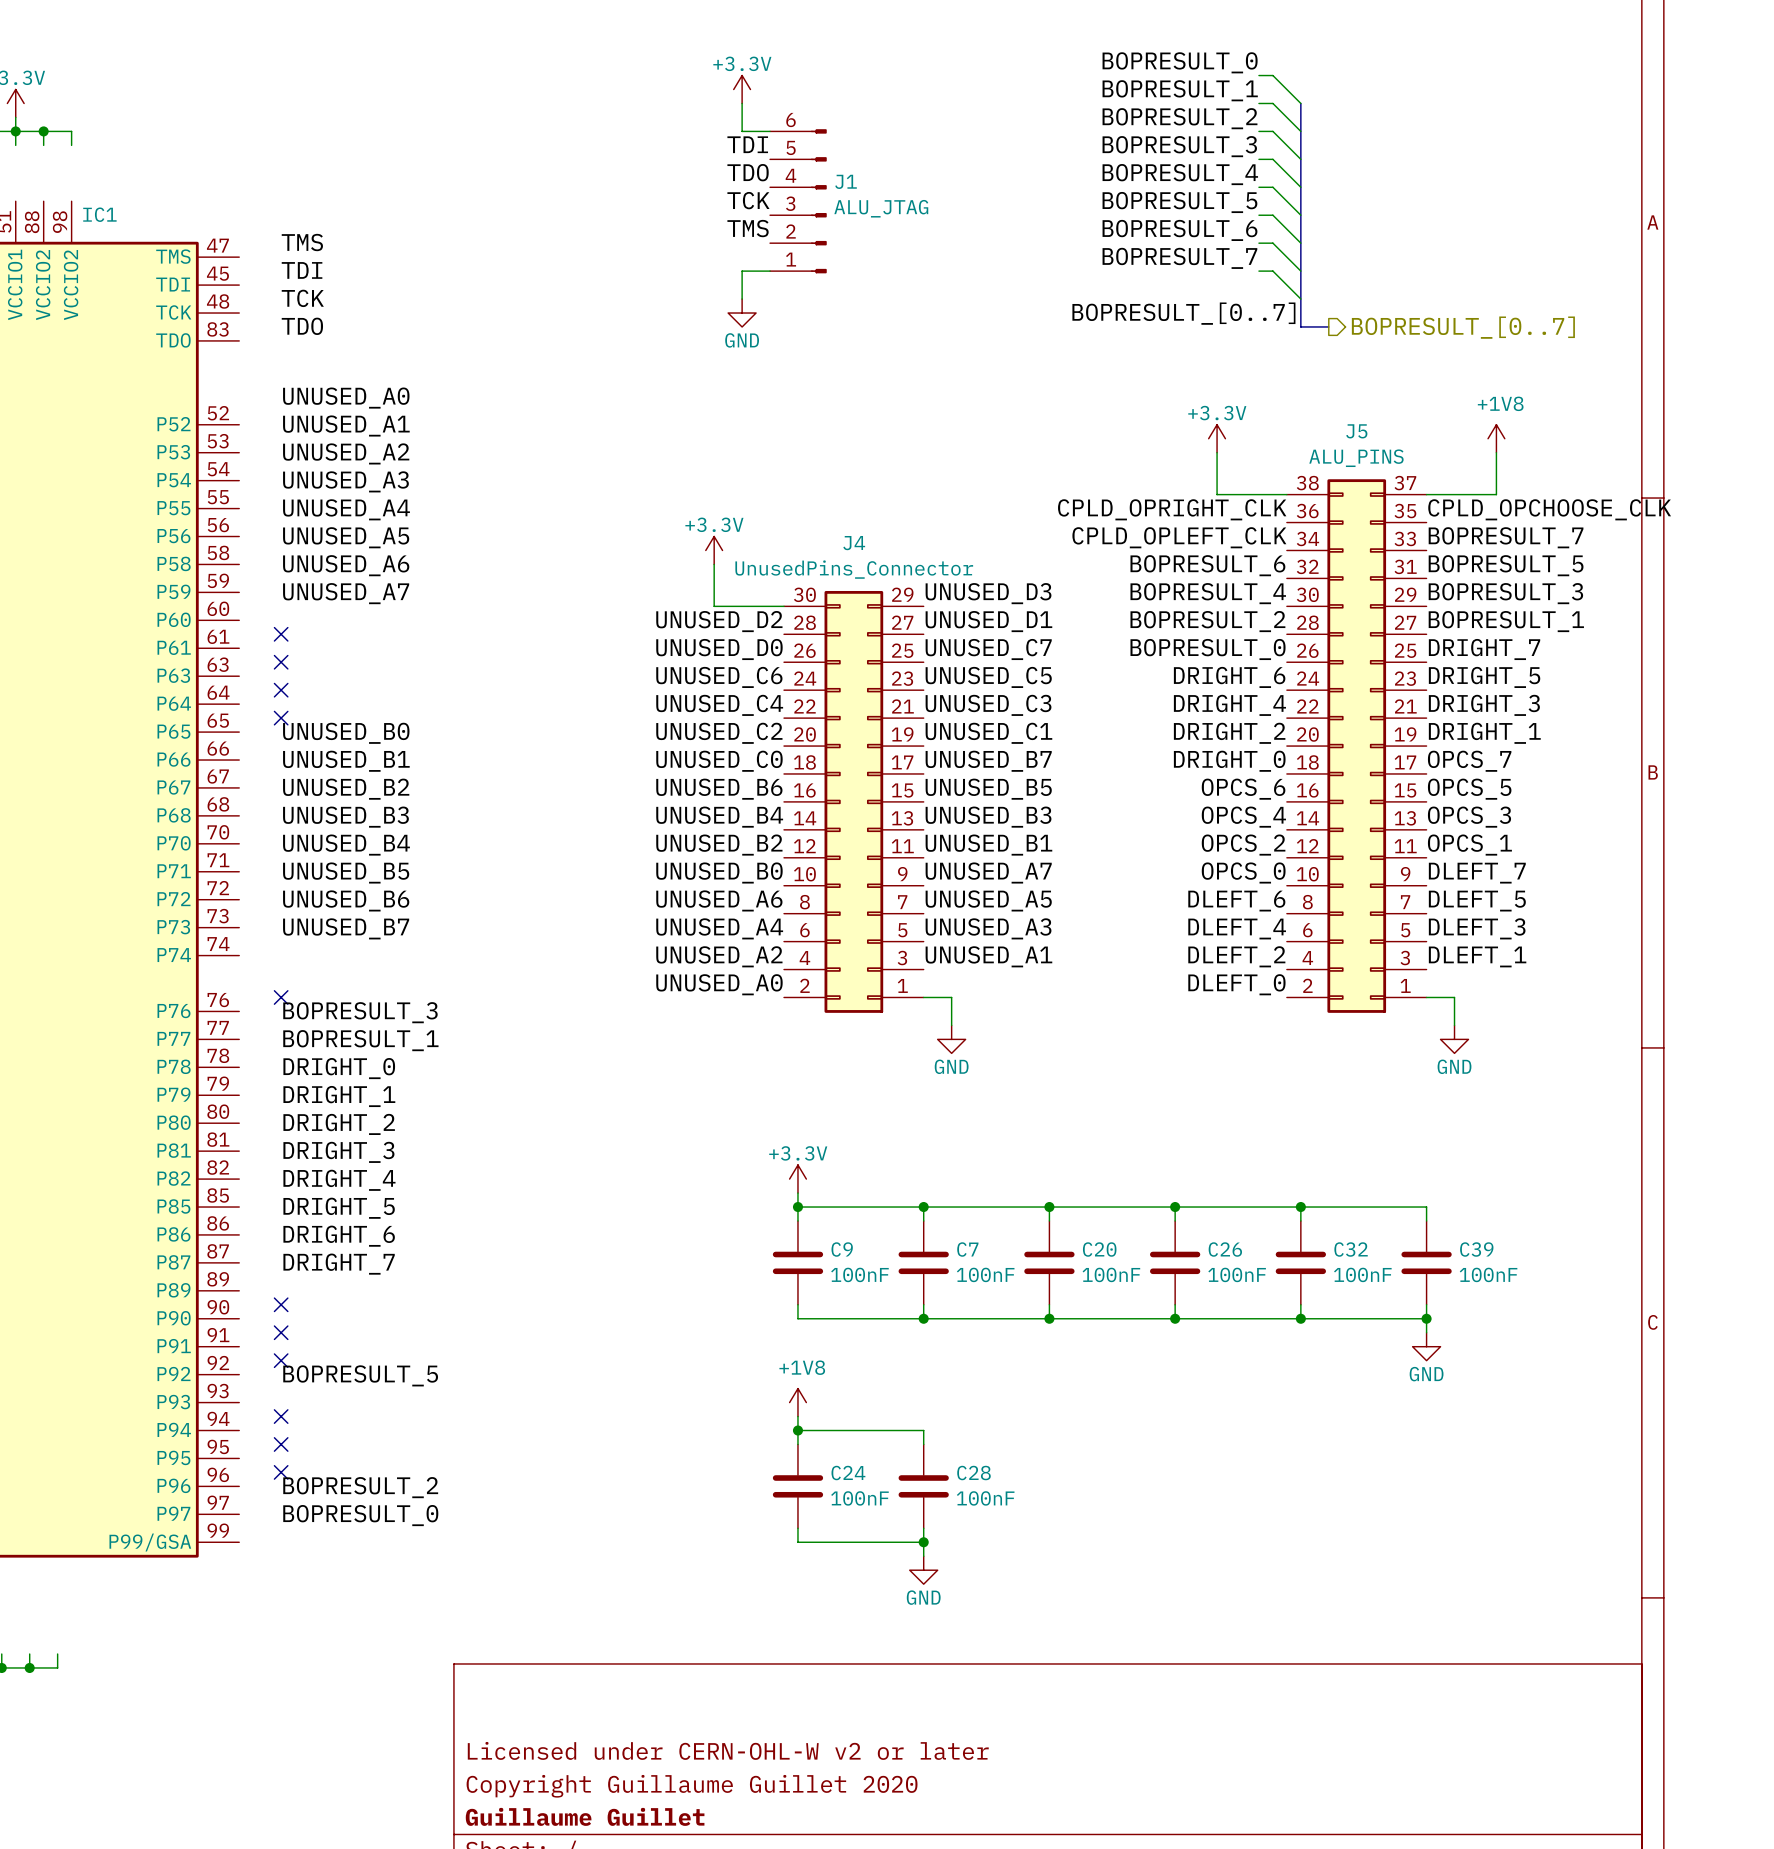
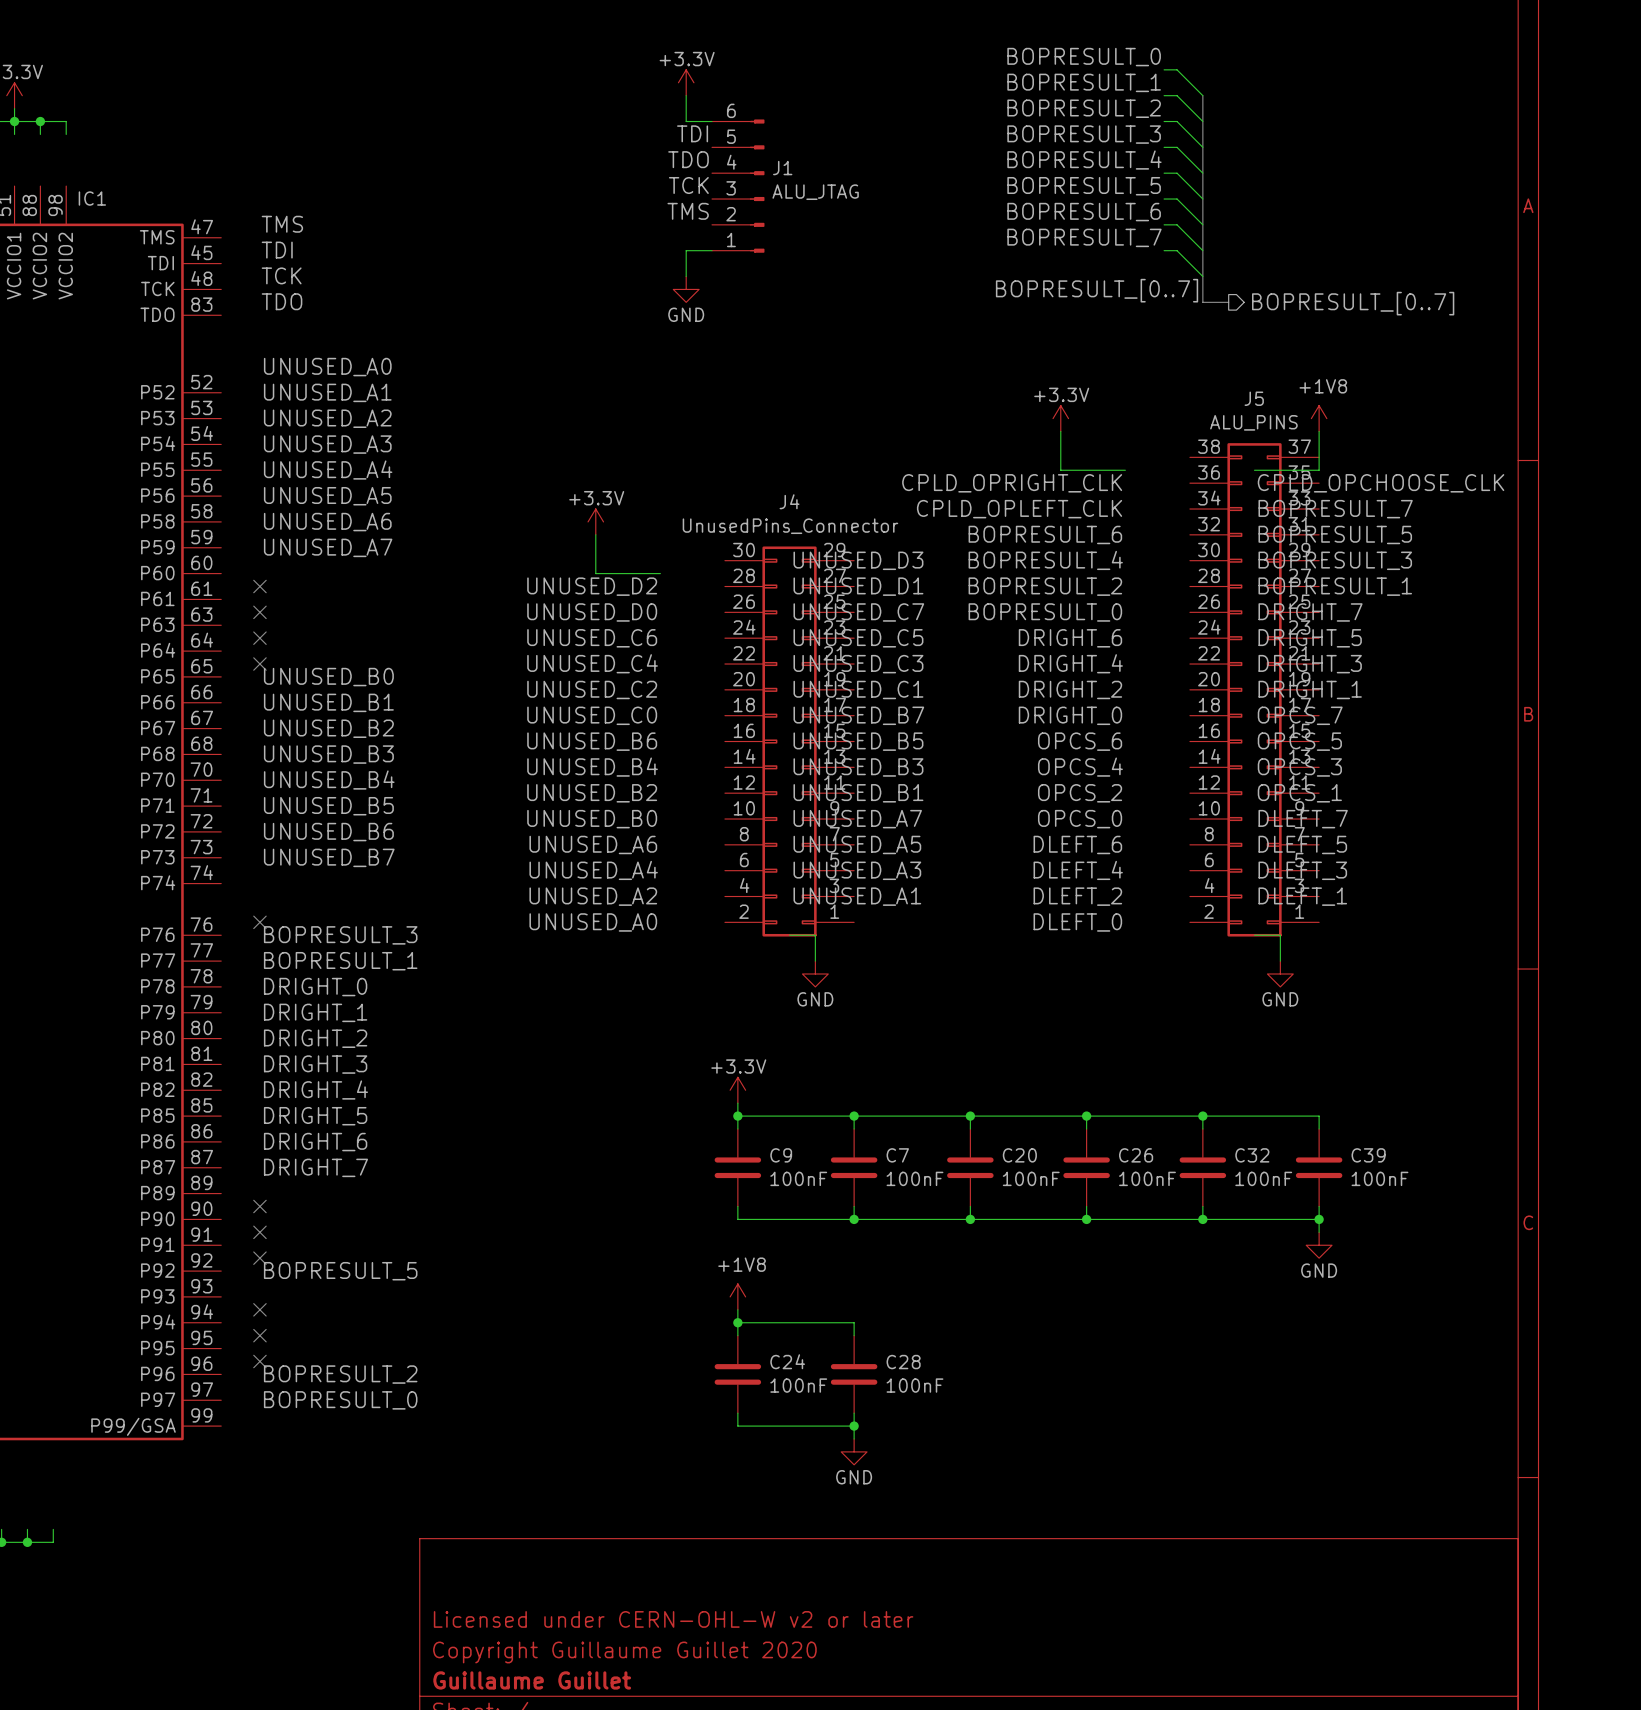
power symbol position: +3.3V (1217, 438) -> +3.3V (1060, 418)
power symbol position: +1V8 (1496, 438) -> +1V8 (1319, 418)
wire: (1217, 452) (1217, 494) (1286, 494) -> (1060, 431) (1060, 470) (1125, 470)
wire: (1496, 452) (1496, 494) (1426, 494) -> (1319, 431) (1319, 470) (1254, 470)
label position: CPLD_OPRIGHT_CLK (1172, 509) -> CPLD_OPRIGHT_CLK (1012, 483)
label position: CPLD_OPCHOOSE_CLK (1549, 509) -> CPLD_OPCHOOSE_CLK (1381, 483)
label position: CPLD_OPLEFT_CLK (1179, 537) -> CPLD_OPLEFT_CLK (1019, 509)
label position: BOPRESULT_7 (1506, 537) -> BOPRESULT_7 (1335, 509)
power symbol position: +3.3V (714, 550) -> +3.3V (595, 521)
wire: (714, 564) (714, 606) (784, 606) -> (595, 534) (595, 573) (660, 573)
label position: BOPRESULT_6 (1207, 565) -> BOPRESULT_6 (1045, 534)
label position: BOPRESULT_5 (1506, 565) -> BOPRESULT_5 (1335, 534)
label position: UNUSED_D3 (988, 593) -> UNUSED_D3 (858, 560)
label position: BOPRESULT_4 (1208, 593) -> BOPRESULT_4 (1045, 560)
label position: BOPRESULT_3 (1505, 593) -> BOPRESULT_3 (1335, 560)
label position: UNUSED_D2 (719, 621) -> UNUSED_D2 (592, 586)
label position: UNUSED_D1 (988, 621) -> UNUSED_D1 (858, 586)
label position: BOPRESULT_2 (1207, 621) -> BOPRESULT_2 (1045, 586)
label position: BOPRESULT_1 (1506, 621) -> BOPRESULT_1 (1335, 586)
label position: UNUSED_D0 (719, 649) -> UNUSED_D0 (592, 612)
label position: UNUSED_C7 (988, 649) -> UNUSED_C7 (858, 612)
label position: BOPRESULT_0 (1208, 649) -> BOPRESULT_0 (1045, 612)
label position: DRIGHT_7 (1484, 649) -> DRIGHT_7 (1310, 612)
label position: UNUSED_C6 (719, 677) -> UNUSED_C6 (592, 638)
label position: UNUSED_C5 (988, 677) -> UNUSED_C5 (858, 638)
label position: DRIGHT_6 (1229, 677) -> DRIGHT_6 (1070, 638)
label position: DRIGHT_5 (1484, 677) -> DRIGHT_5 (1310, 638)
label position: UNUSED_C4 (719, 705) -> UNUSED_C4 (592, 663)
label position: UNUSED_C3 (988, 705) -> UNUSED_C3 (858, 664)
label position: DRIGHT_4 (1229, 705) -> DRIGHT_4 (1070, 663)
label position: DRIGHT_3 (1484, 705) -> DRIGHT_3 (1310, 664)
label position: UNUSED_C2 (719, 733) -> UNUSED_C2 (592, 689)
label position: UNUSED_C1 (988, 733) -> UNUSED_C1 (858, 689)
label position: DRIGHT_2 (1229, 733) -> DRIGHT_2 (1070, 689)
label position: DRIGHT_1 (1484, 733) -> DRIGHT_1 (1310, 689)
label position: UNUSED_C0 (719, 761) -> UNUSED_C0 (592, 715)
label position: UNUSED_B7 (988, 761) -> UNUSED_B7 (858, 715)
label position: DRIGHT_0 (1229, 761) -> DRIGHT_0 (1070, 715)
label position: OPCS_7 (1469, 761) -> OPCS_7 (1300, 715)
label position: UNUSED_B6 (719, 789) -> UNUSED_B6 (592, 741)
label position: UNUSED_B5 (988, 789) -> UNUSED_B5 (858, 741)
label position: OPCS_6 (1243, 789) -> OPCS_6 (1080, 741)
label position: OPCS_5 (1469, 789) -> OPCS_5 (1299, 741)
label position: UNUSED_B4 (719, 817) -> UNUSED_B4 (592, 767)
label position: UNUSED_B3 (988, 817) -> UNUSED_B3 (858, 767)
label position: OPCS_4 (1243, 817) -> OPCS_4 (1080, 767)
label position: OPCS_3 (1469, 817) -> OPCS_3 (1299, 767)
label position: UNUSED_B2 (719, 845) -> UNUSED_B2 (592, 793)
label position: UNUSED_B1 (988, 845) -> UNUSED_B1 (858, 793)
label position: OPCS_2 (1243, 845) -> OPCS_2 (1080, 793)
label position: OPCS_1 (1469, 845) -> OPCS_1 (1299, 793)
label position: UNUSED_B0 (719, 872) -> UNUSED_B0 (592, 819)
label position: UNUSED_A7 (988, 872) -> UNUSED_A7 (857, 819)
label position: OPCS_0 (1243, 872) -> OPCS_0 (1080, 819)
label position: DLEFT_7 (1477, 873) -> DLEFT_7 (1303, 819)
label position: UNUSED_A6 (719, 900) -> UNUSED_A6 (593, 844)
label position: UNUSED_A5 (988, 900) -> UNUSED_A5 (857, 844)
label position: DLEFT_6 (1236, 901) -> DLEFT_6 (1077, 844)
label position: DLEFT_5 (1477, 901) -> DLEFT_5 (1302, 844)
label position: UNUSED_A4 (719, 928) -> UNUSED_A4 (593, 870)
label position: UNUSED_A3 (988, 928) -> UNUSED_A3 (857, 870)
label position: DLEFT_3 (1477, 928) -> DLEFT_3 (1302, 870)
label position: DLEFT_4 (1237, 929) -> DLEFT_4 (1078, 870)
label position: UNUSED_A2 (719, 956) -> UNUSED_A2 (593, 896)
label position: UNUSED_A1 (988, 956) -> UNUSED_A1 (857, 896)
label position: DLEFT_2 (1236, 956) -> DLEFT_2 (1077, 896)
label position: DLEFT_1 (1477, 956) -> DLEFT_1 (1302, 896)
label position: UNUSED_A0 (719, 984) -> UNUSED_A0 (593, 922)
label position: DLEFT_0 (1236, 984) -> DLEFT_0 (1077, 922)
wire: (923, 997) (951, 997) (951, 1025) -> (789, 935) (815, 935) (815, 961)
wire: (1426, 997) (1454, 997) (1454, 1025) -> (1254, 935) (1280, 935) (1280, 961)
power symbol position: GND (951, 1039) -> GND (815, 974)
power symbol position: GND (1454, 1039) -> GND (1280, 974)

